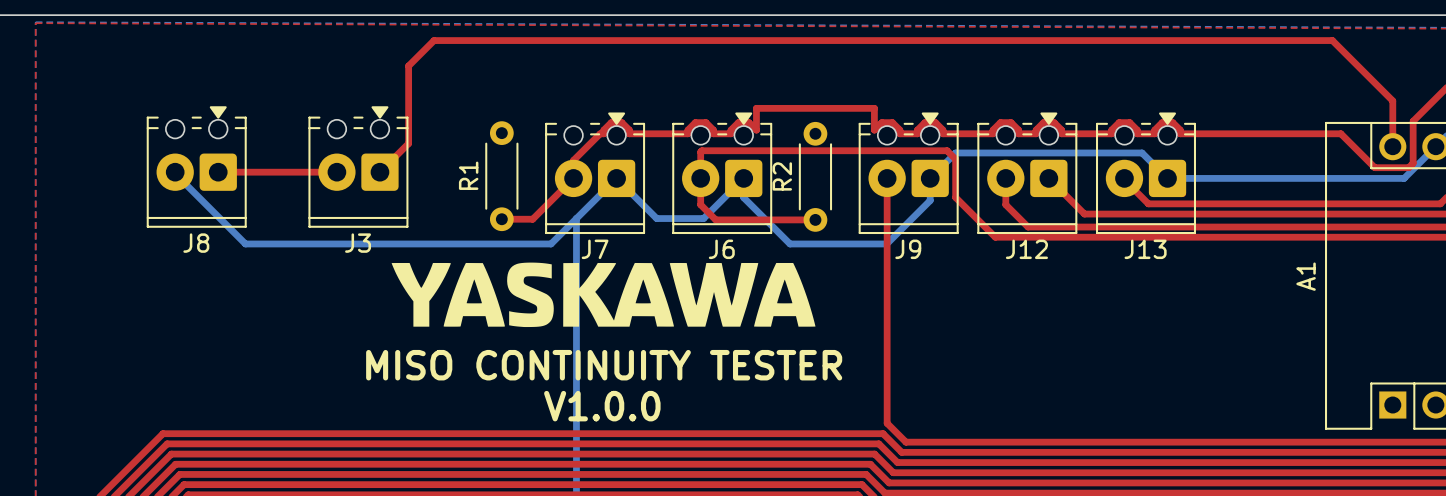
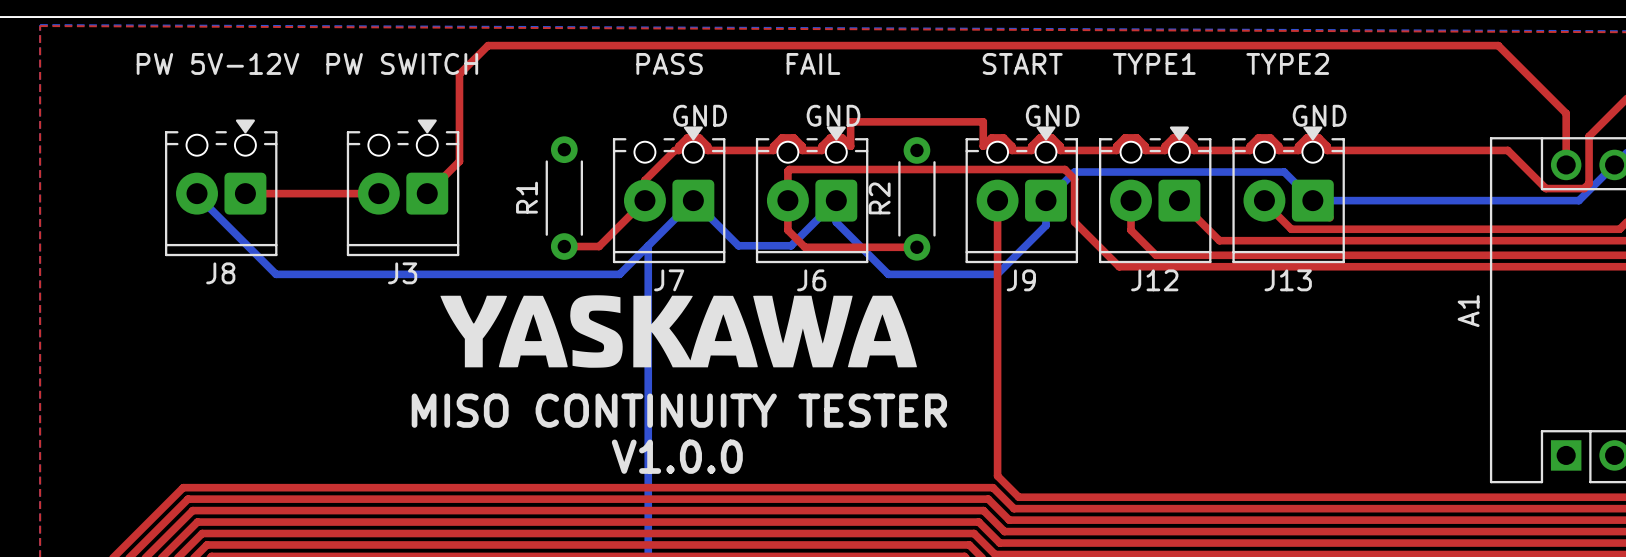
J8 value: none -> PW 5V-12V (218, 63)
J3 value: none -> PW SWITCH (402, 63)
J7 value: none -> PASS (669, 63)
J6 value: none -> FAIL (813, 63)
J9 value: none -> START (1022, 63)
J12 value: none -> TYPE1 (1154, 63)
J13 value: none -> TYPE2 (1287, 63)
text: none -> GND (700, 115)
text: none -> GND (833, 115)
text: none -> GND (1052, 115)
text: none -> GND (1319, 115)

